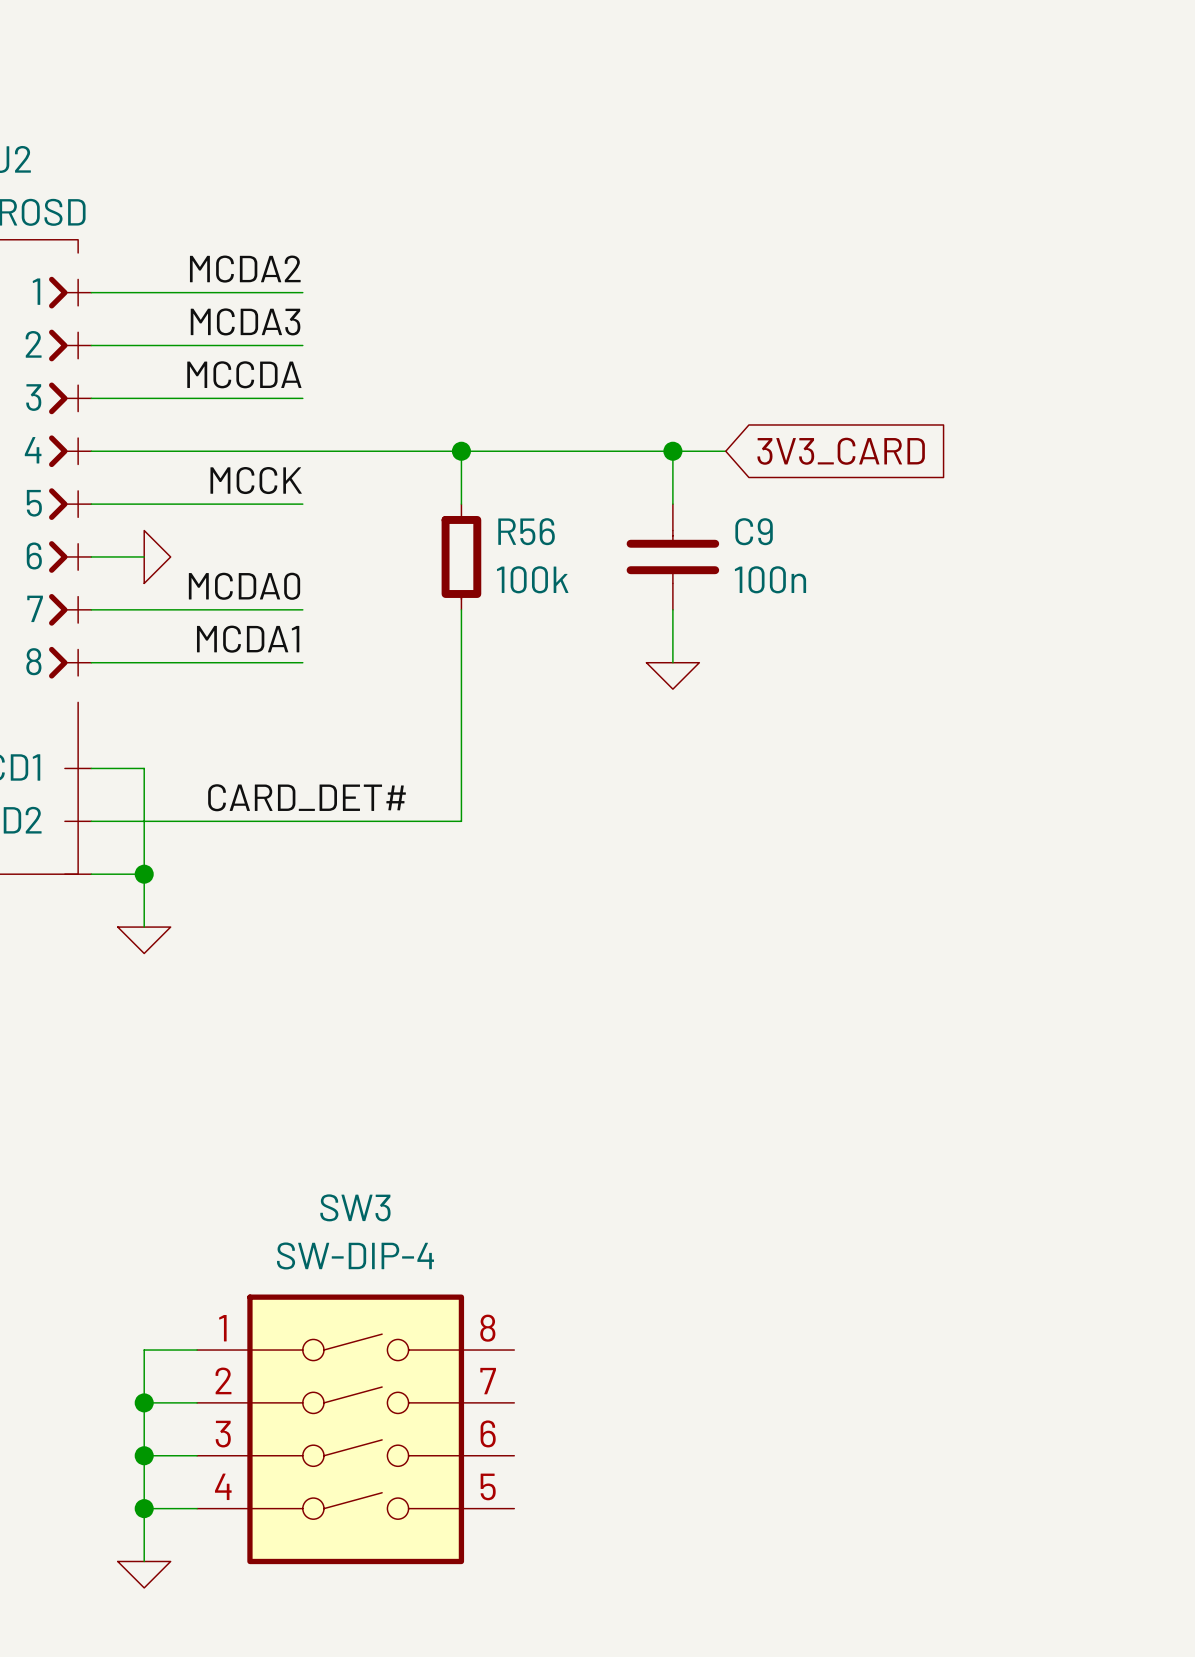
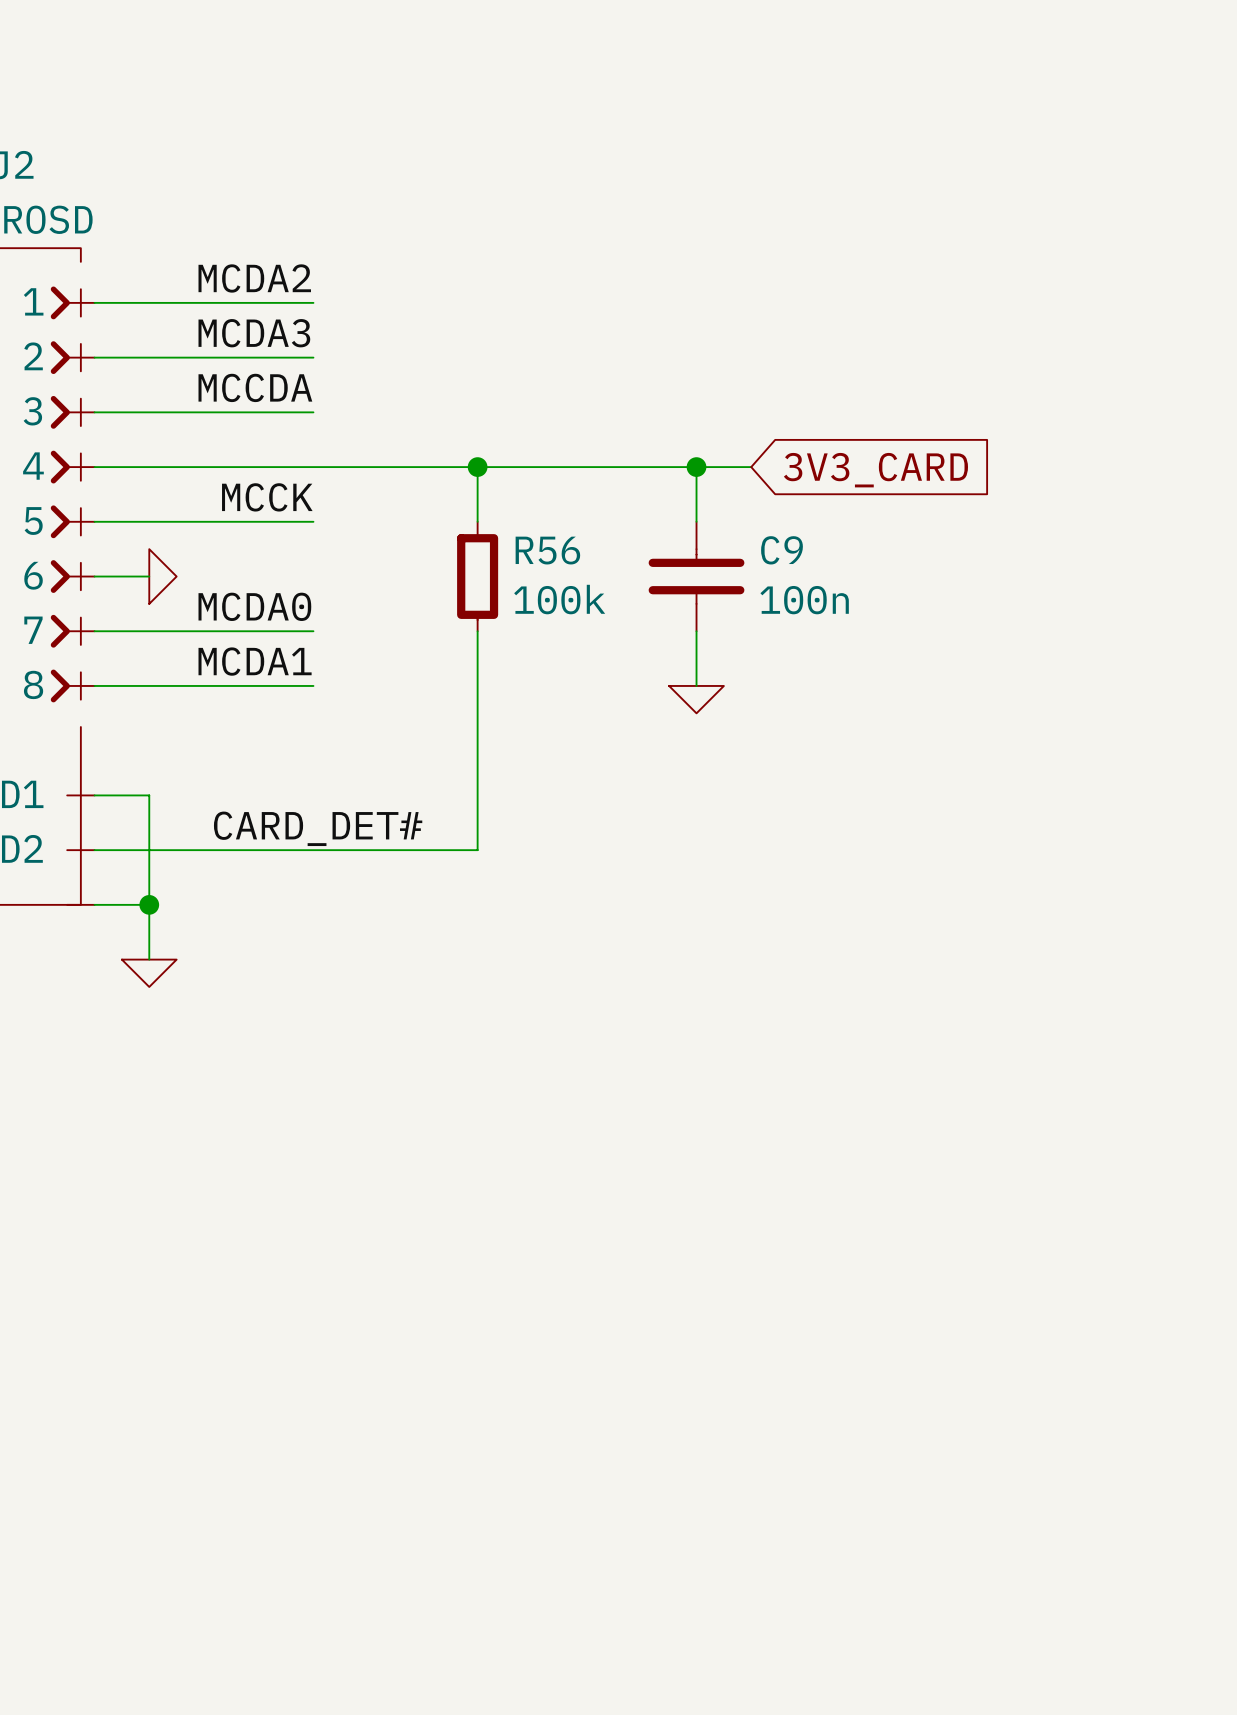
wire: (197, 1350) (144, 1350) (144, 1561) -> none
wire: (144, 1402) (197, 1402) -> none
junction: (144, 1402) -> none
SW3: SW-DIP-4 (355, 1429) -> none
wire: (144, 1455) (197, 1455) -> none
junction: (144, 1455) -> none
wire: (144, 1508) (197, 1508) -> none
junction: (144, 1508) -> none
power symbol: (144, 1574) -> none

